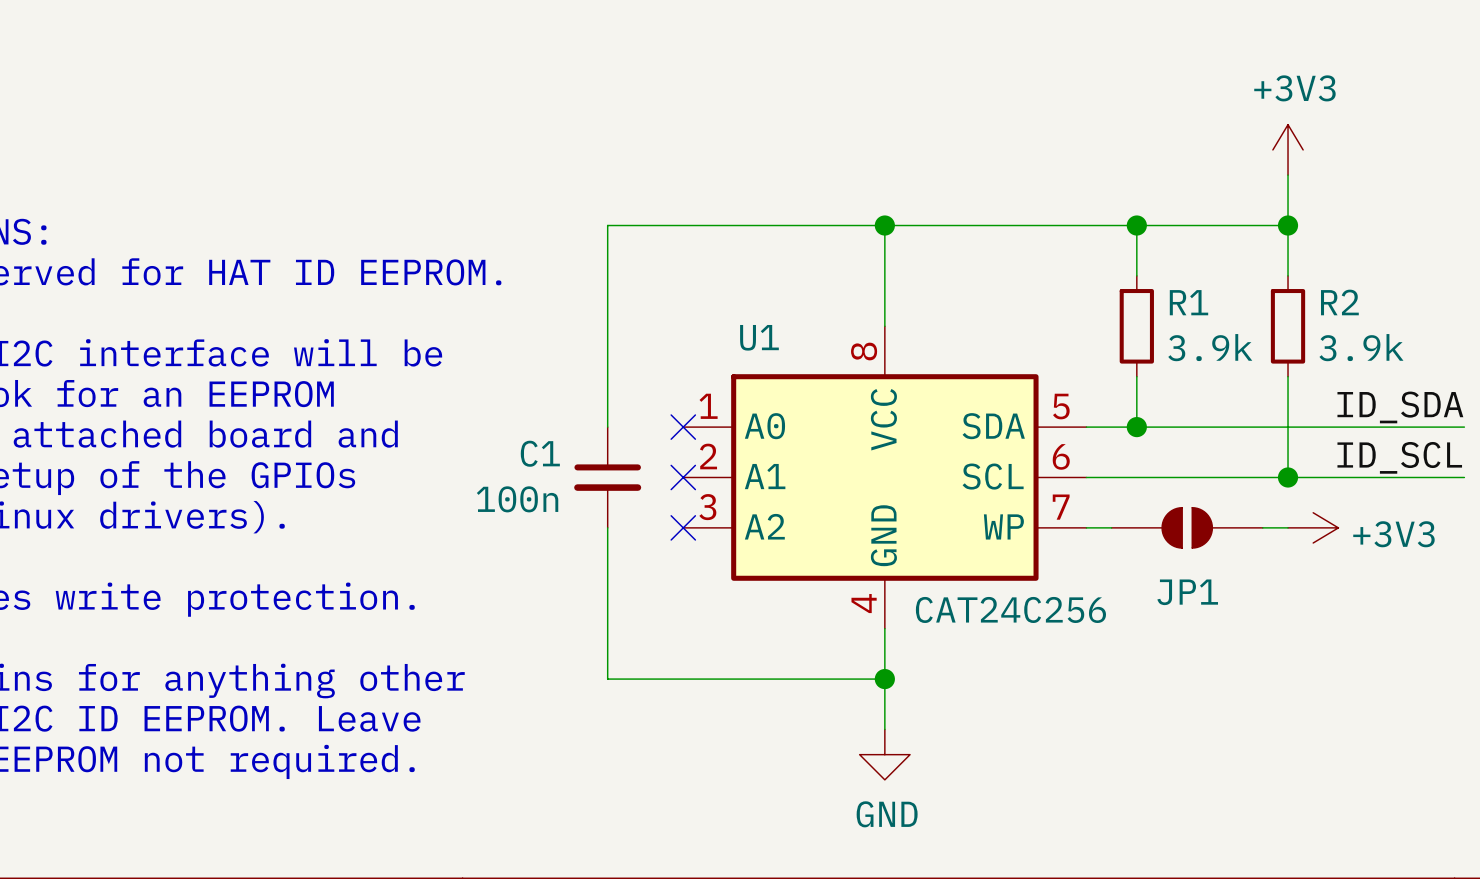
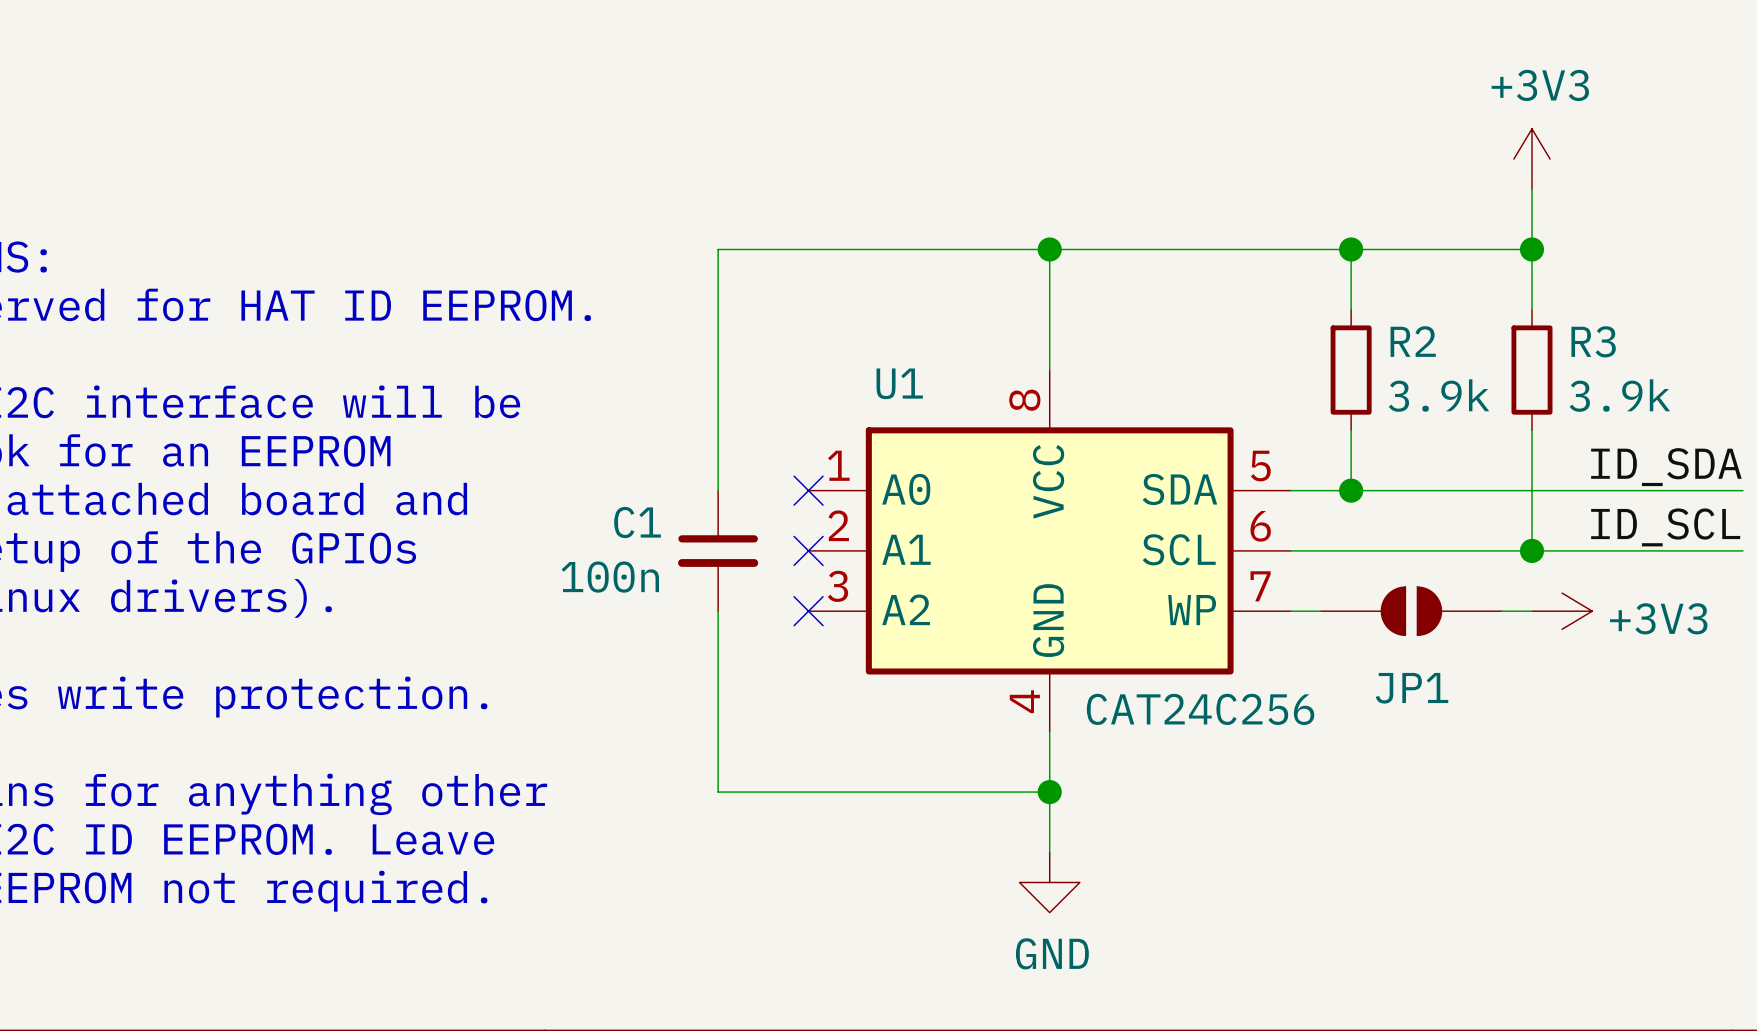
R1 name: R1 (1188, 302) -> R2 (1413, 341)
R2 name: R2 (1339, 302) -> R3 (1593, 341)

